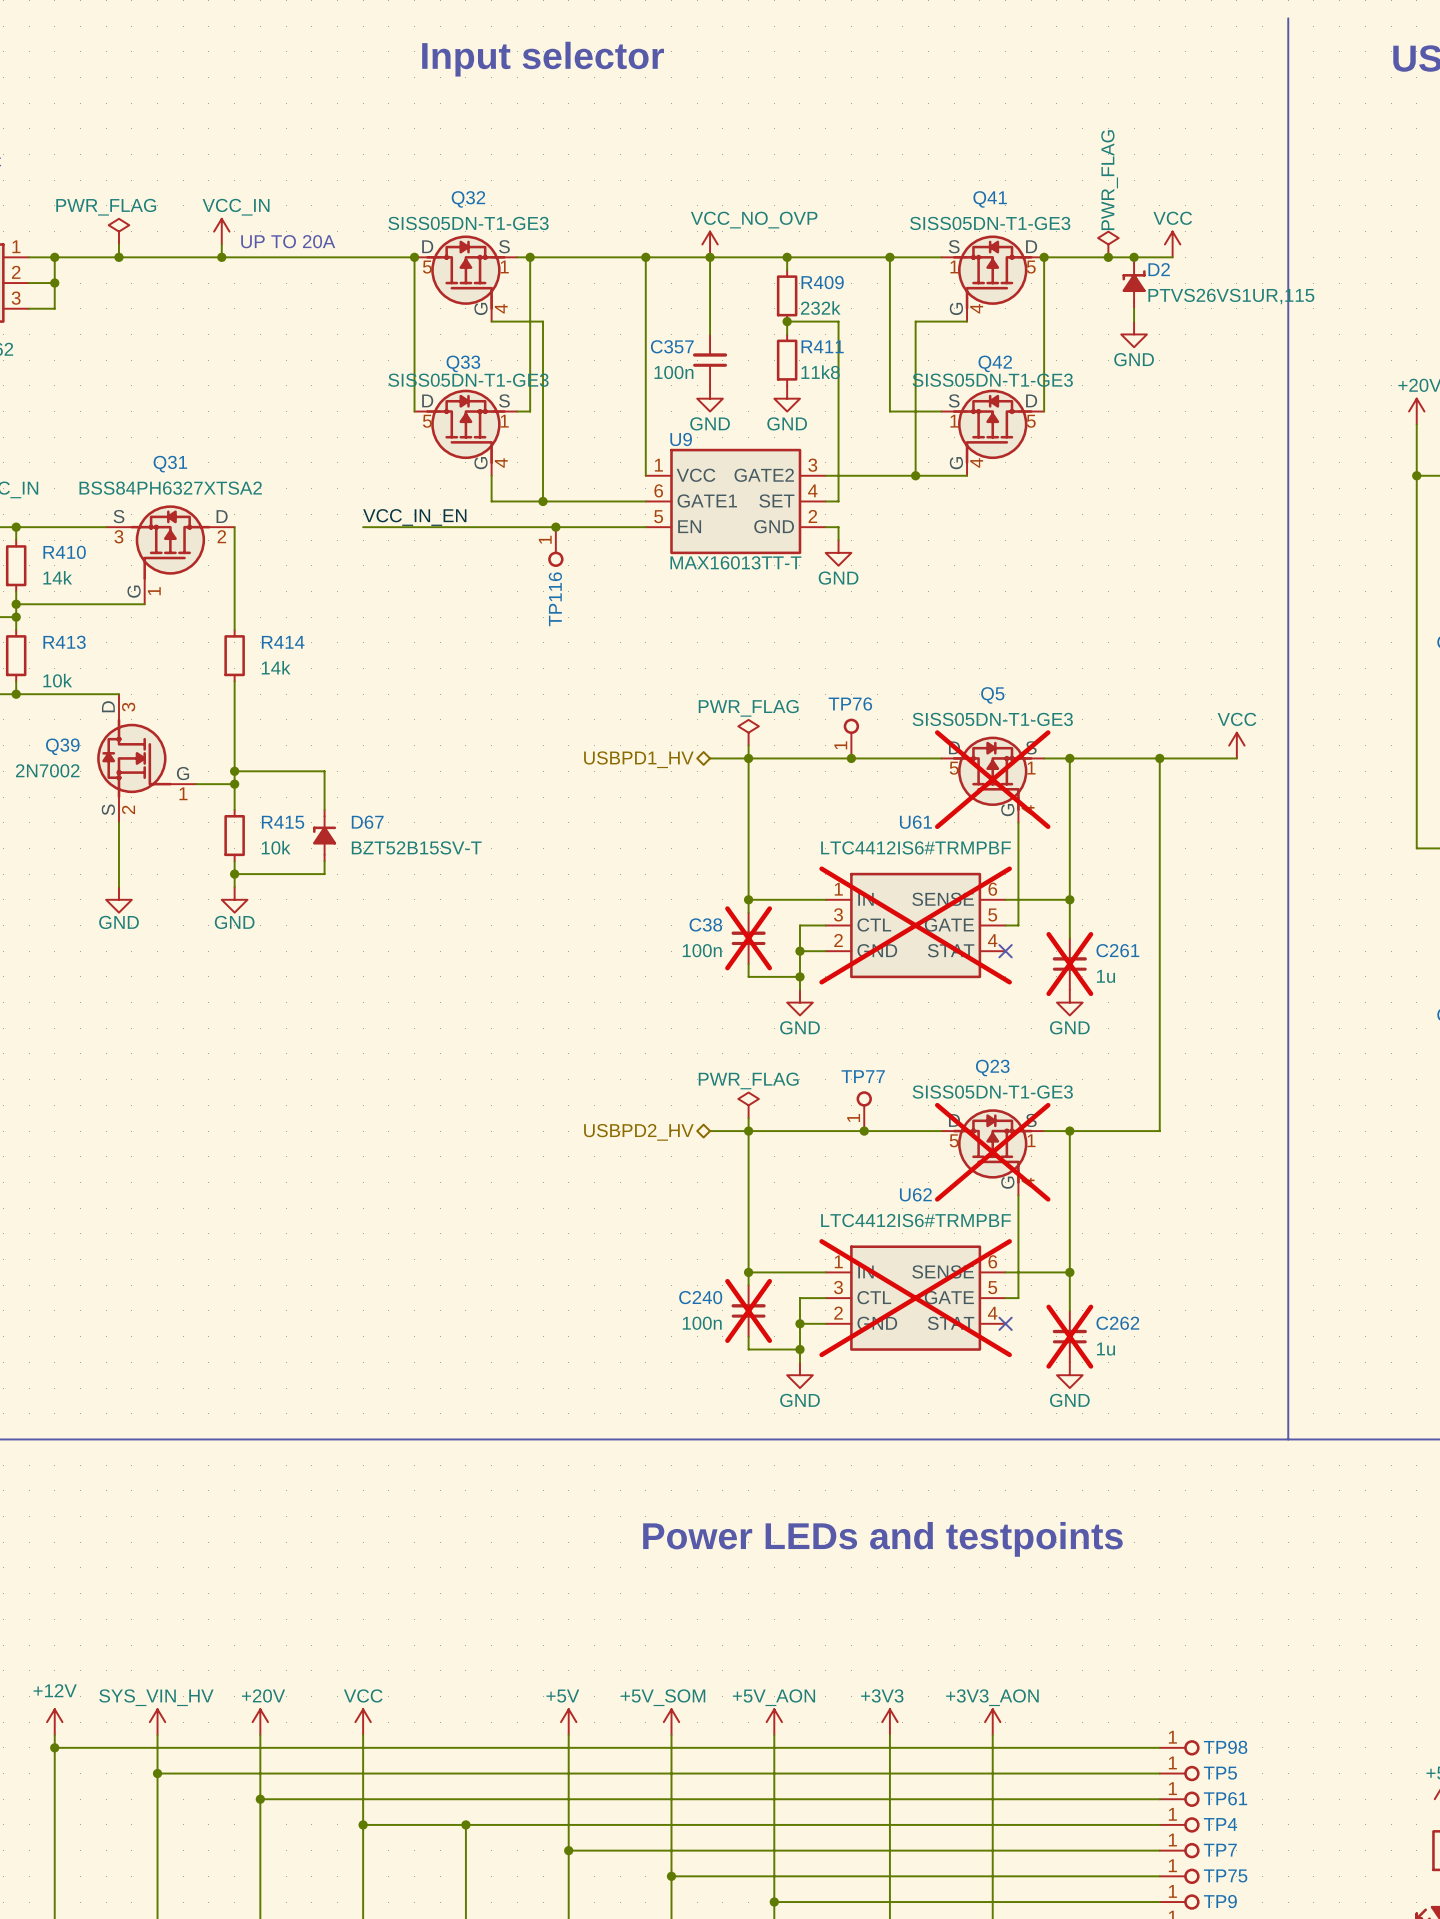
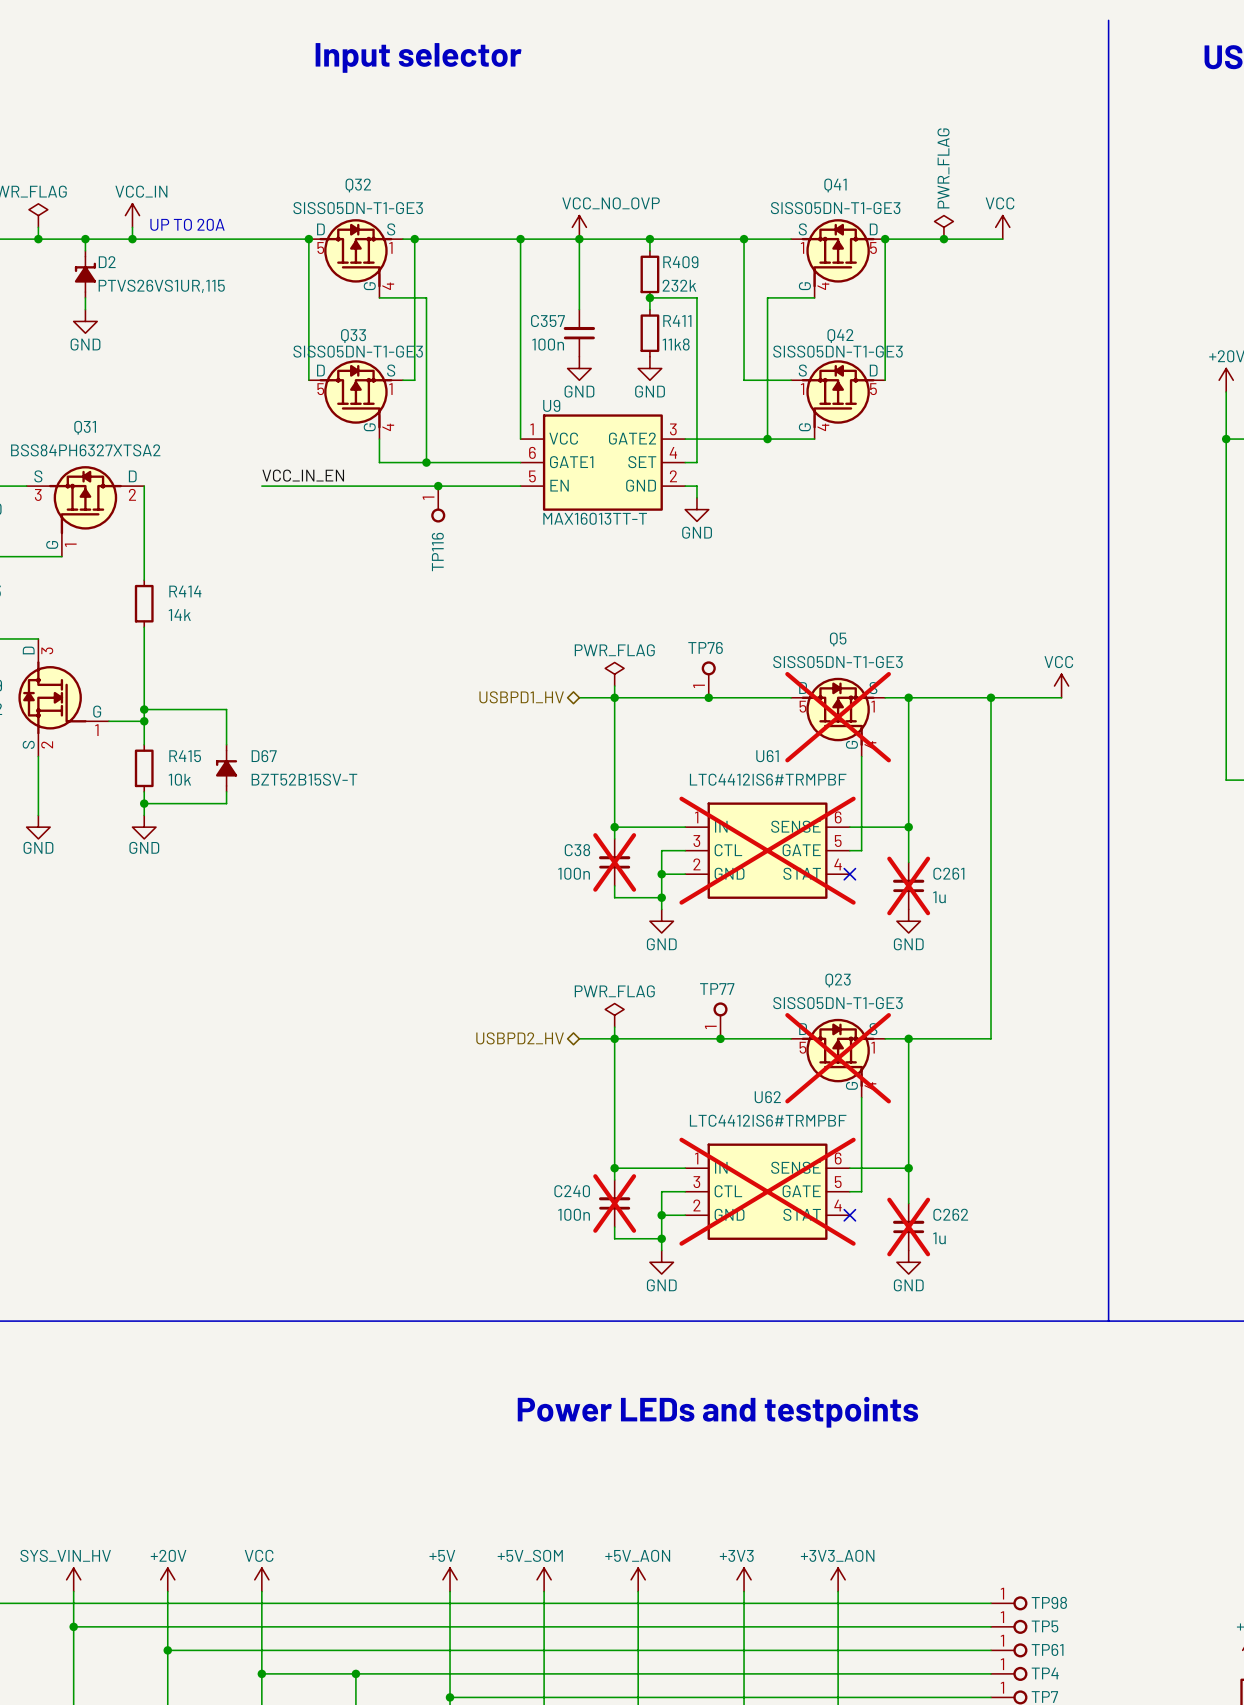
wire: none -> (85, 239) (85, 250)
junction: none -> (85, 239)
junction: (1134, 257) -> none
D2 position: (1134, 283) -> (85, 274)
wire: (1134, 308) (1134, 321) -> none
wire: none -> (85, 297) (85, 309)
power symbol: GND (1134, 334) -> none
power symbol: none -> GND (85, 321)

